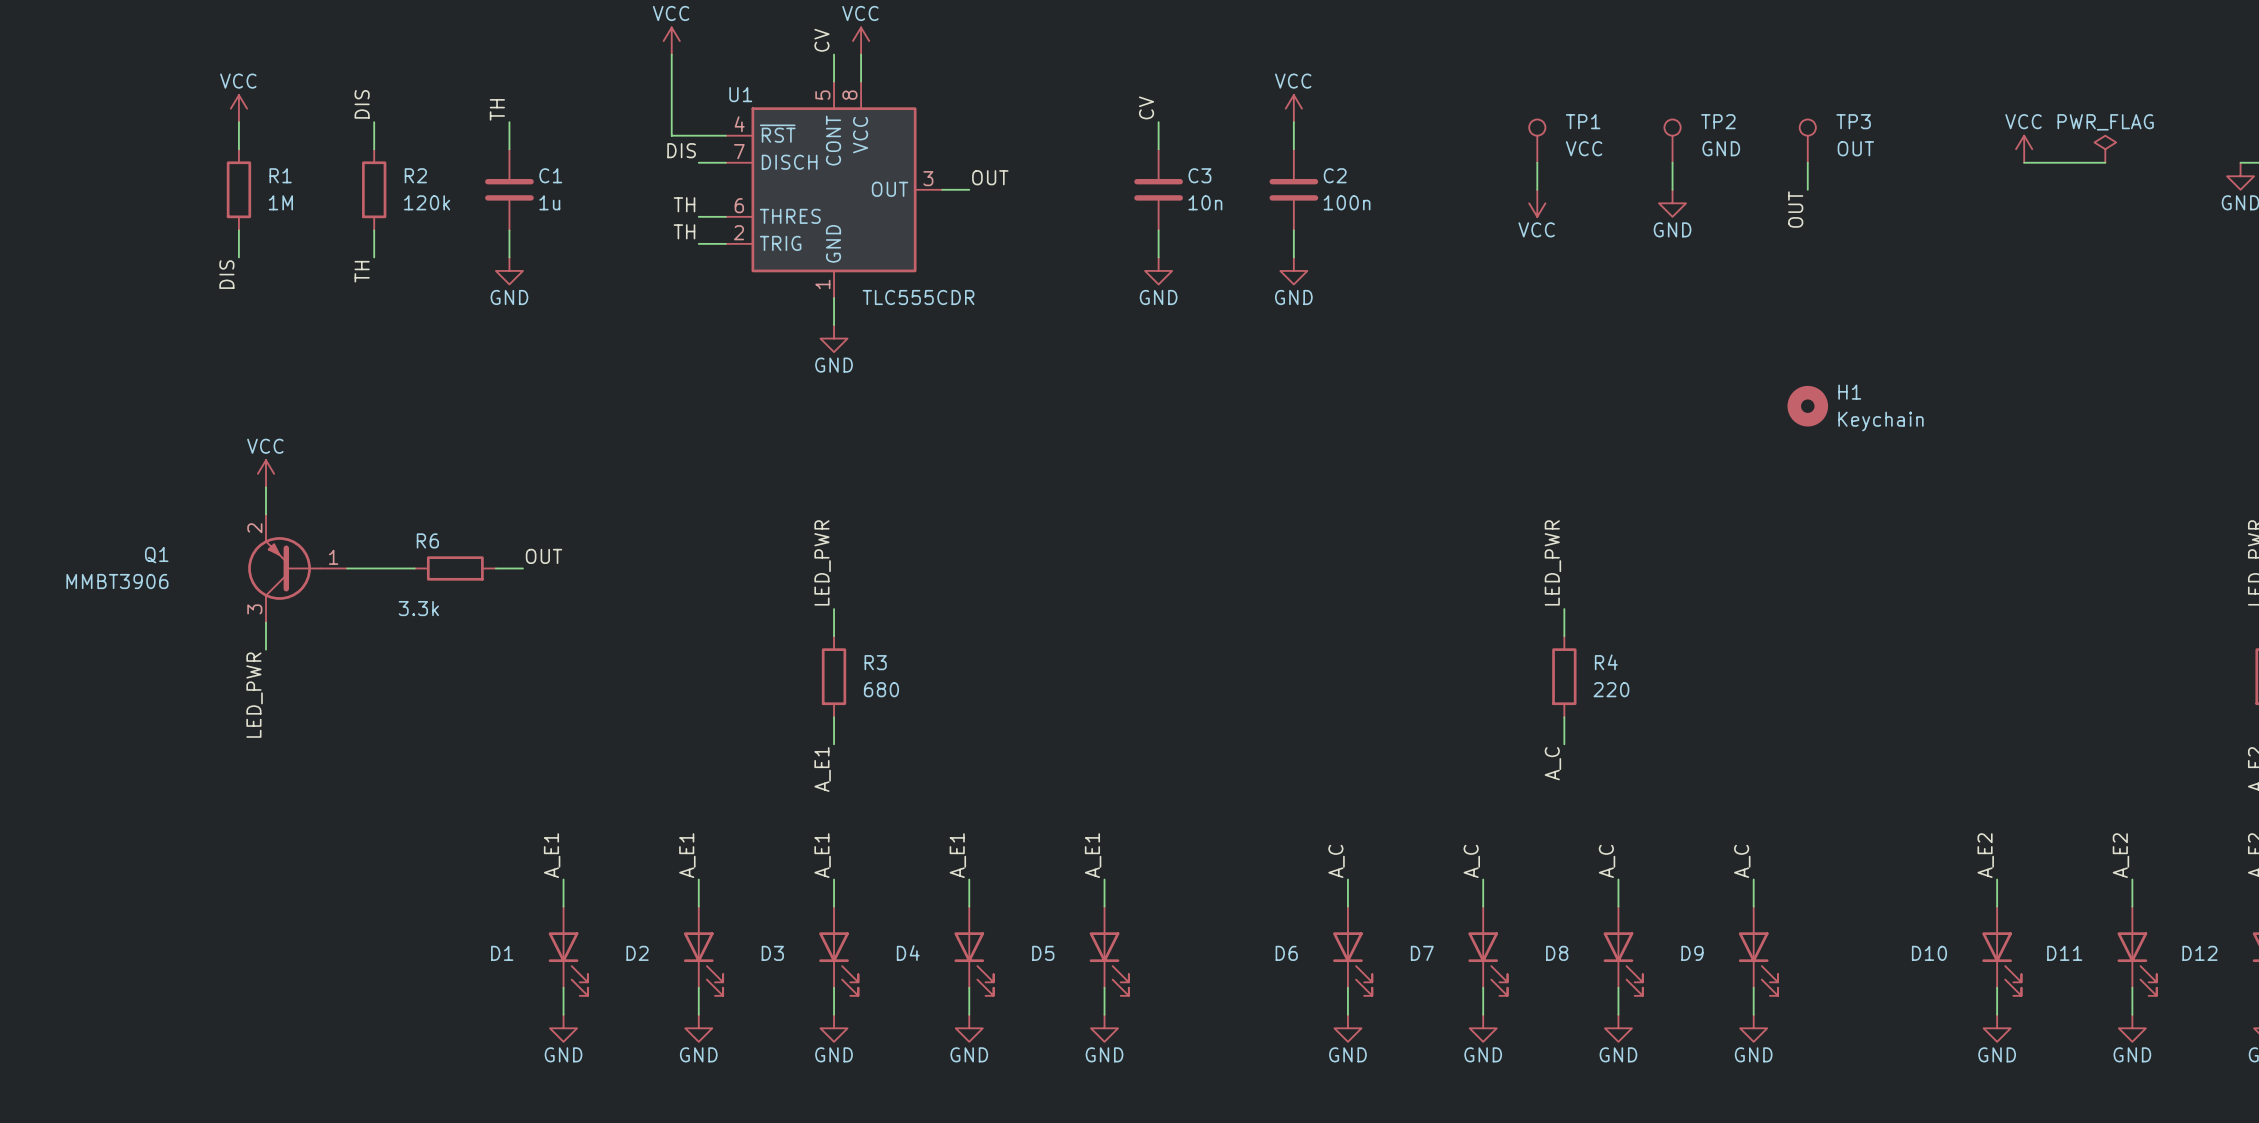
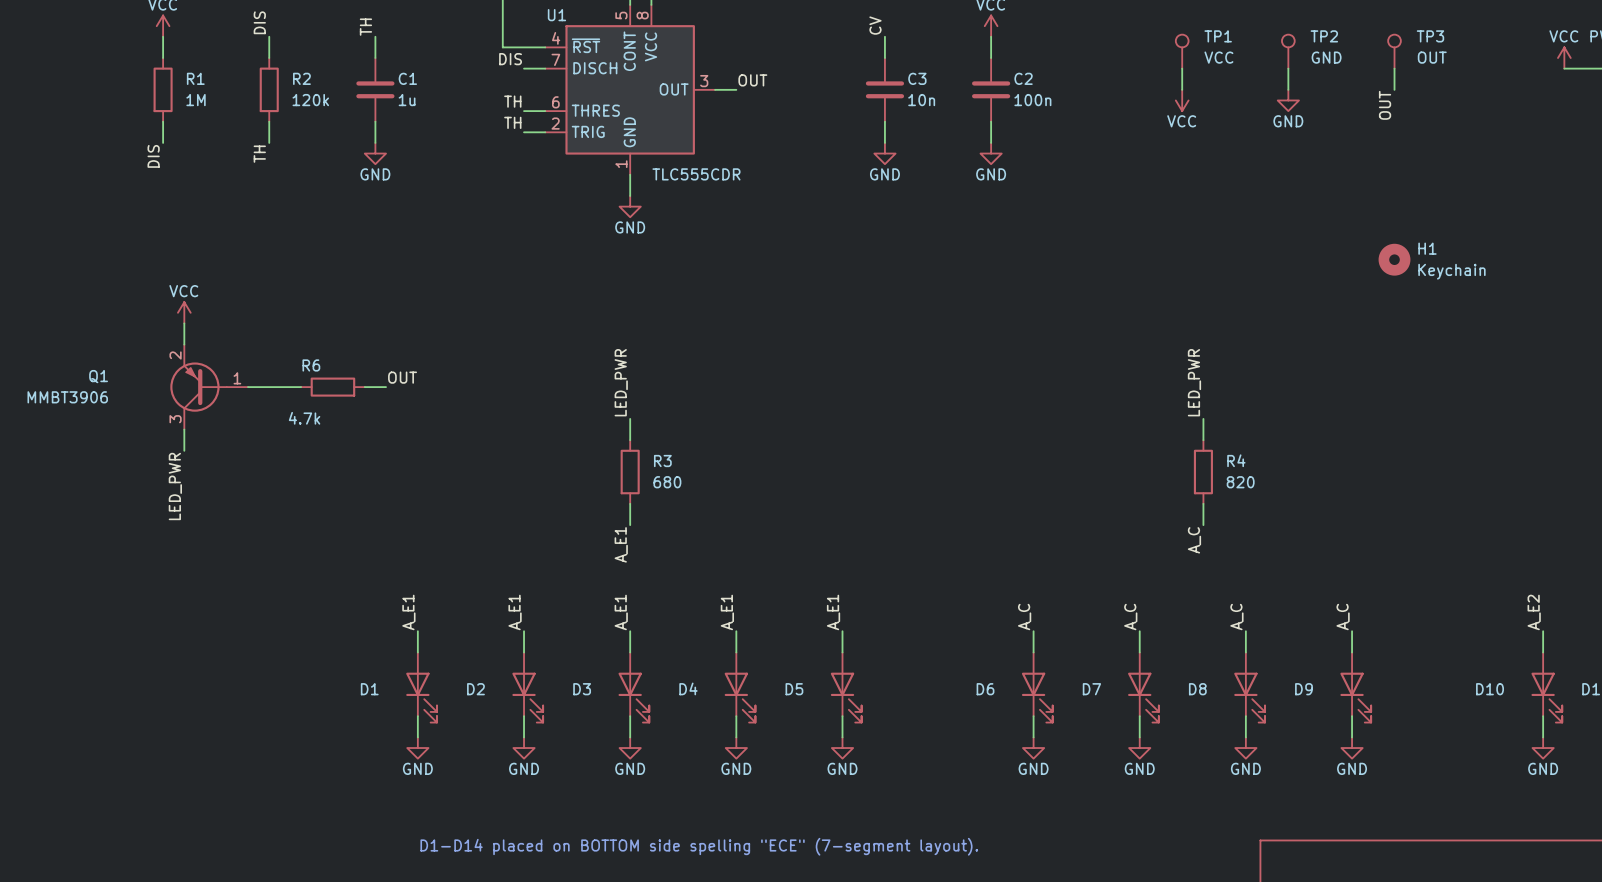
R6 value: 3.3k (418, 608) -> 4.7k (304, 418)
R4 value: 220 (1611, 689) -> 820 (1240, 482)

